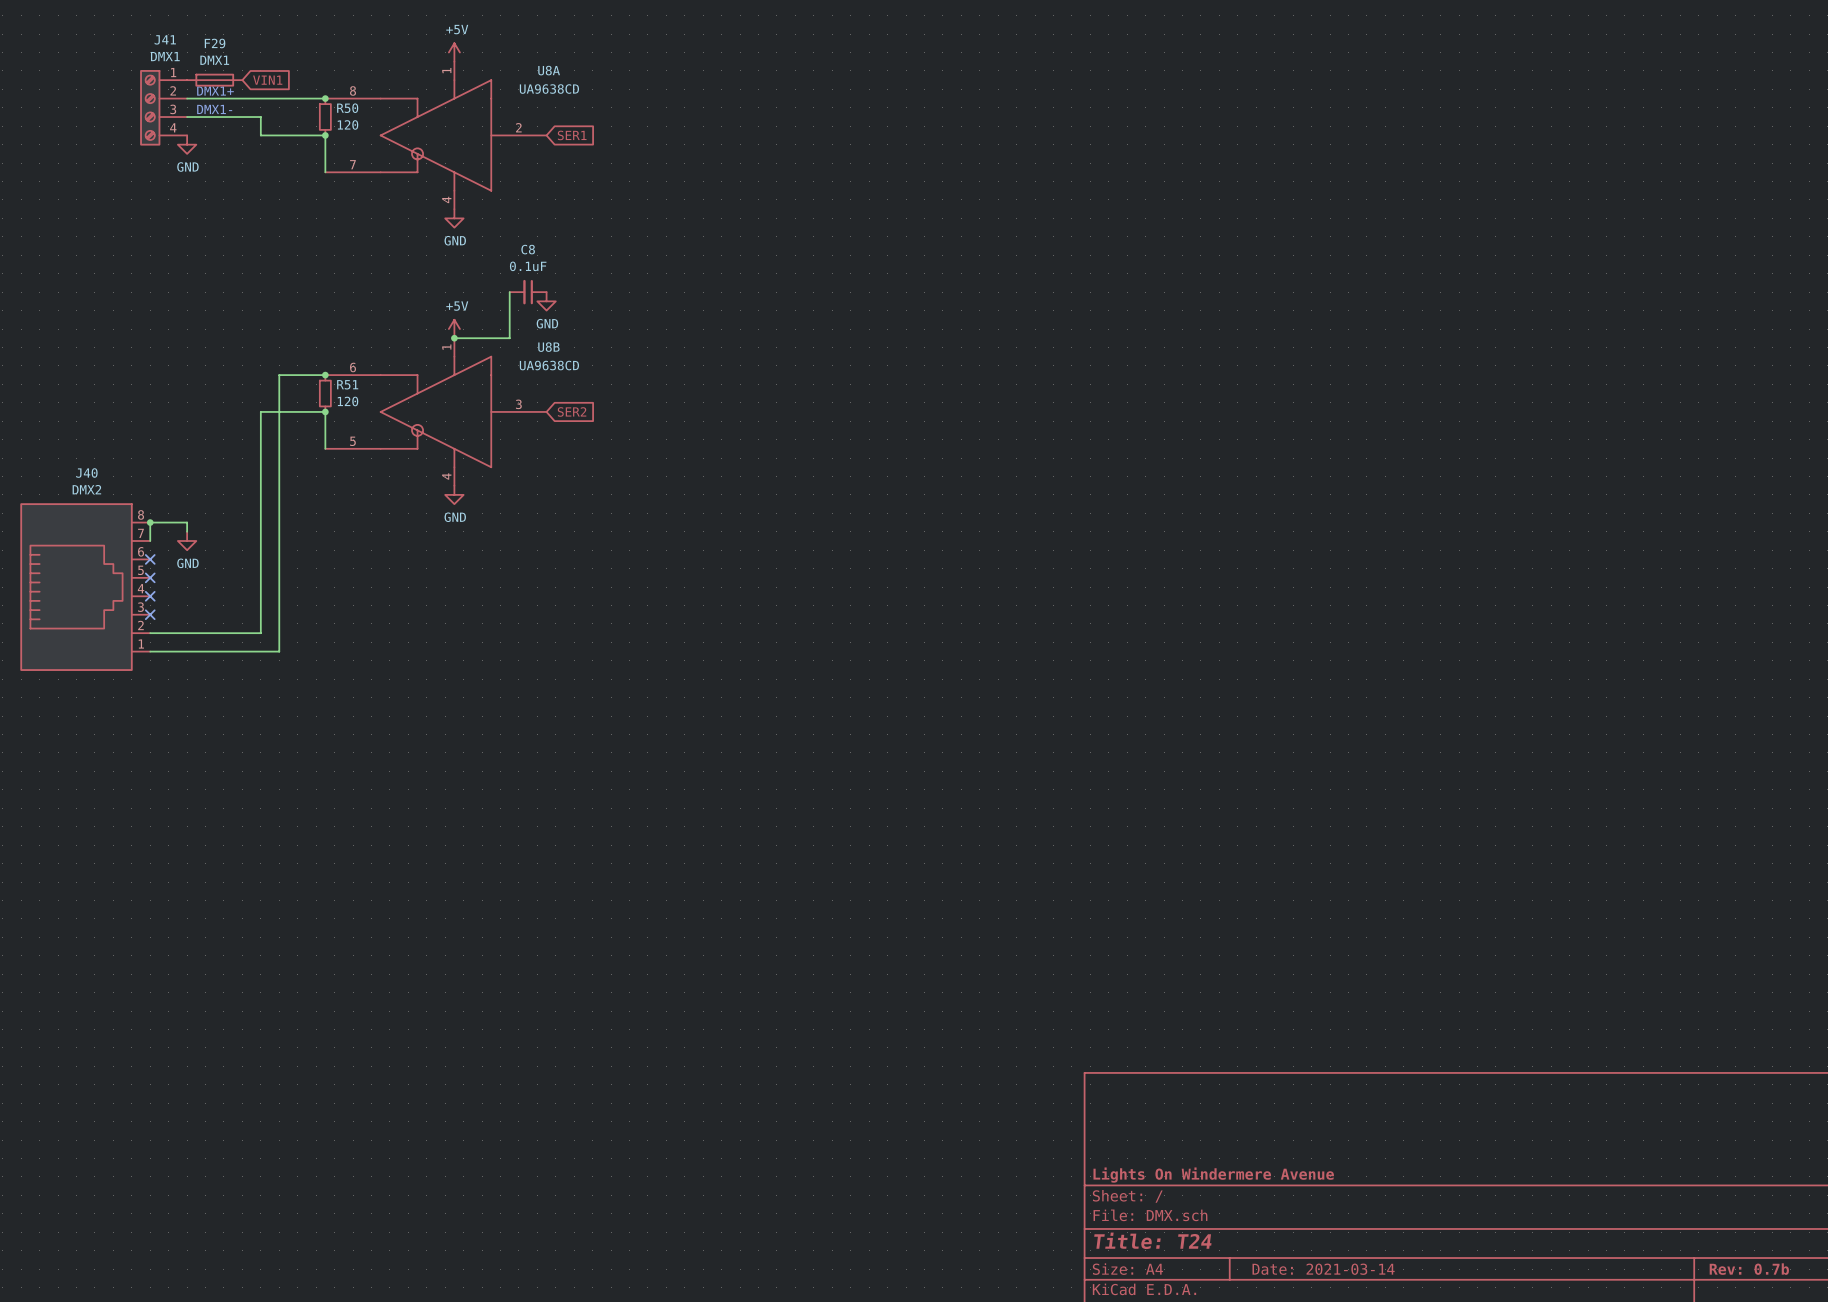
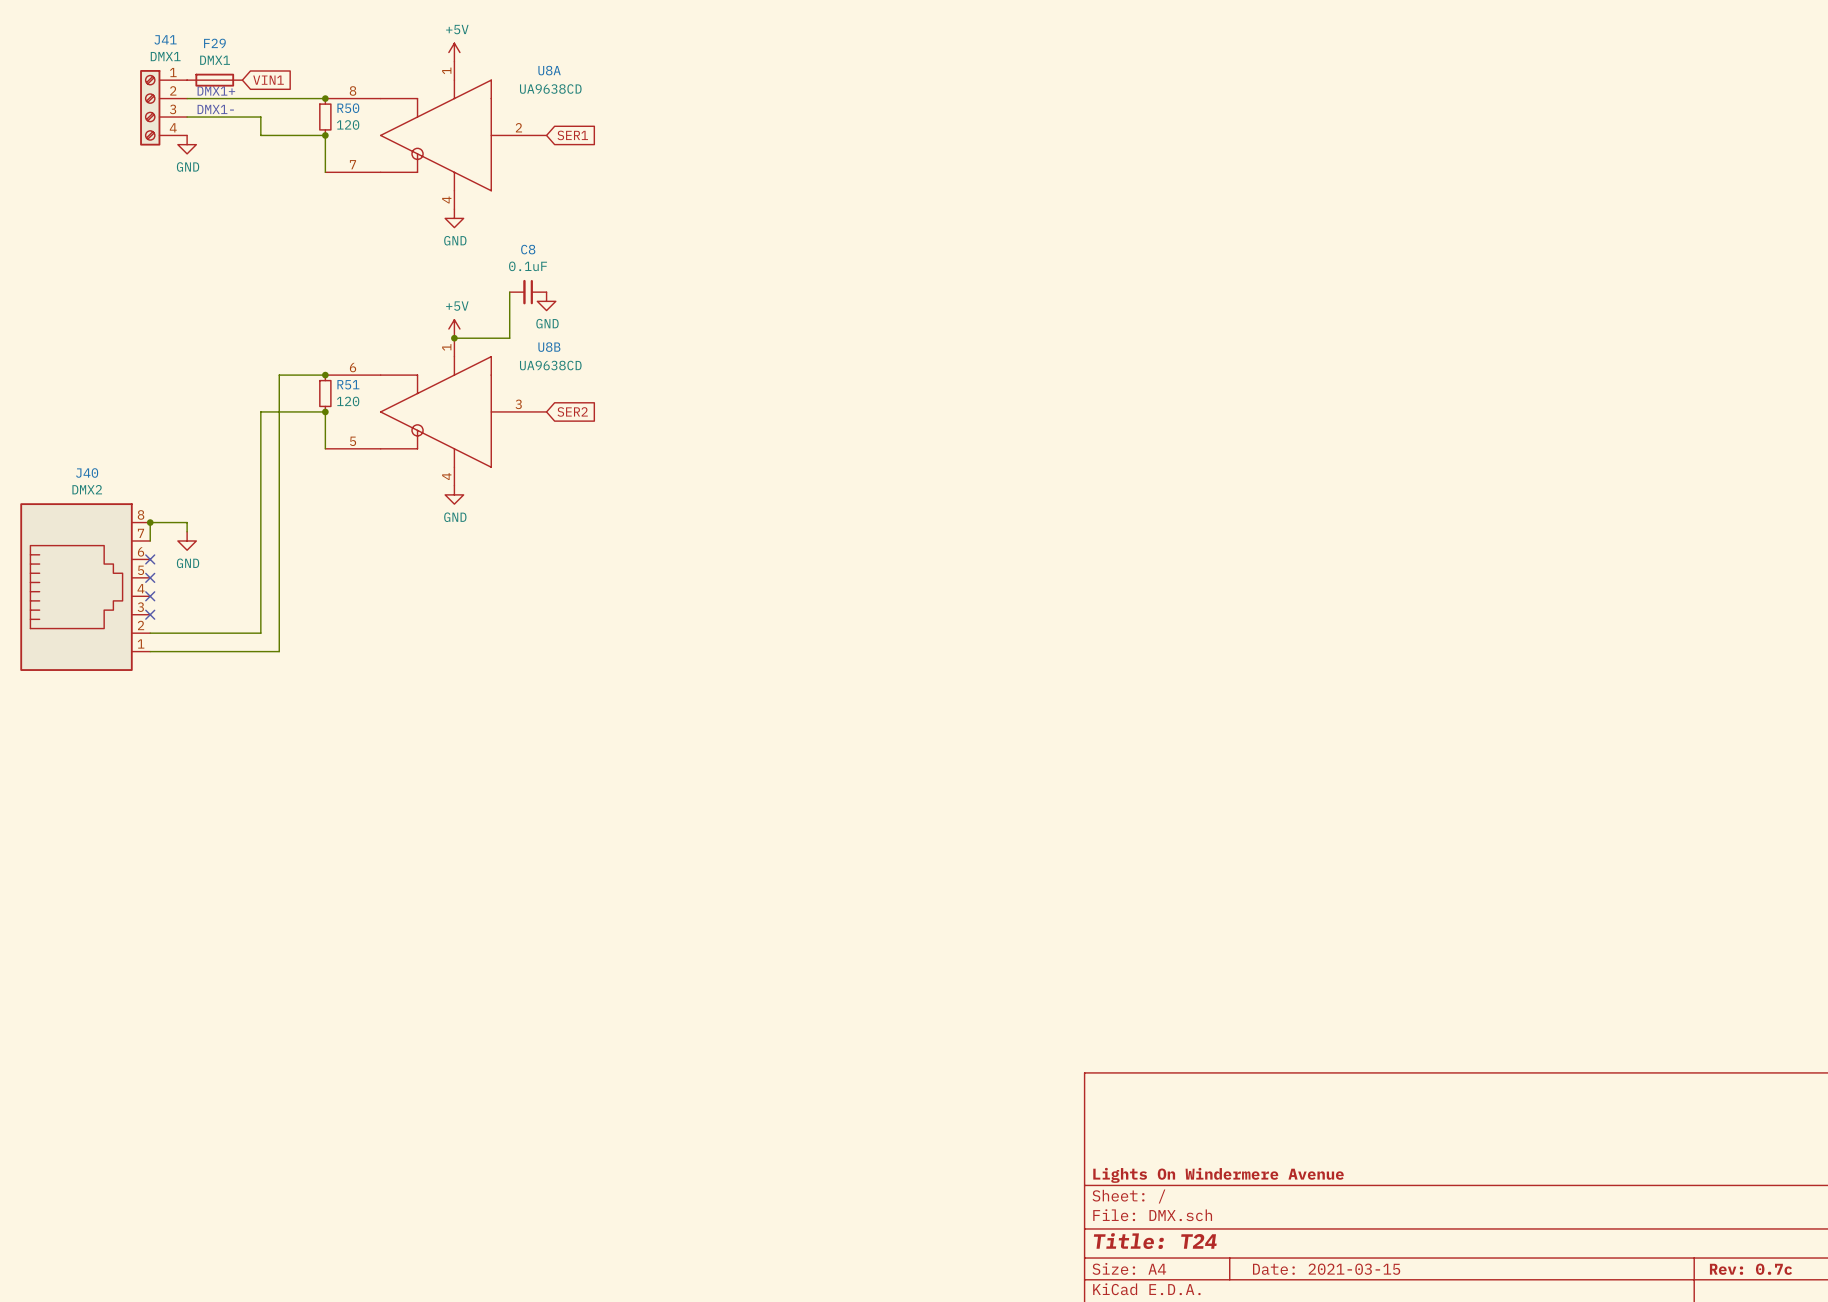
title block: Date: 2021-03-14 (1323, 1269) -> Date: 2021-03-15 (1326, 1269)
title block: Rev: 0.7b (1749, 1269) -> Rev: 0.7c (1750, 1269)

